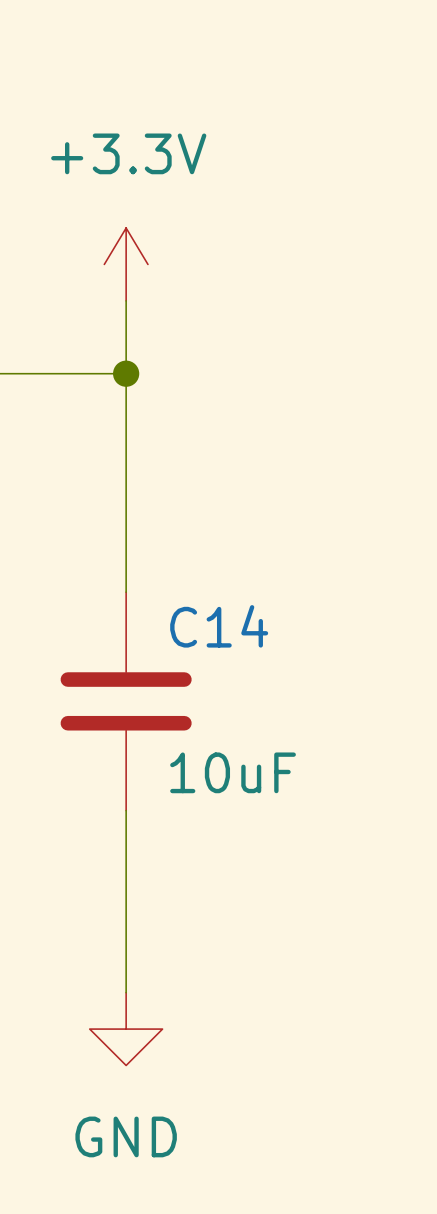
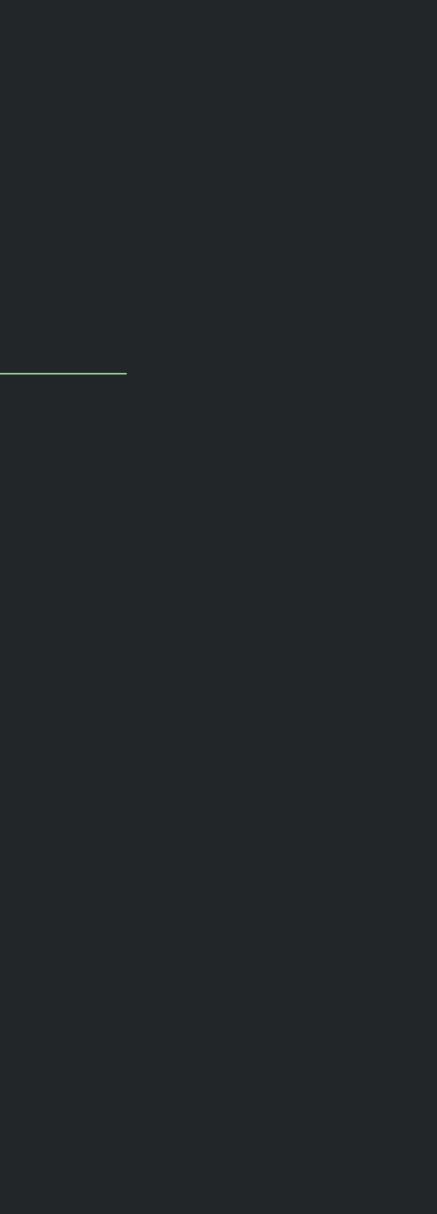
power symbol: +3.3V (126, 264) -> none
wire: (126, 300) (126, 592) -> none
junction: (126, 373) -> none
C14: 10uF (126, 701) -> none
wire: (126, 810) (126, 992) -> none
power symbol: GND (126, 1029) -> none

